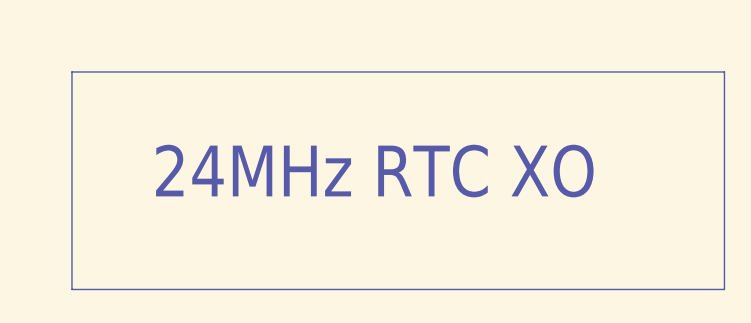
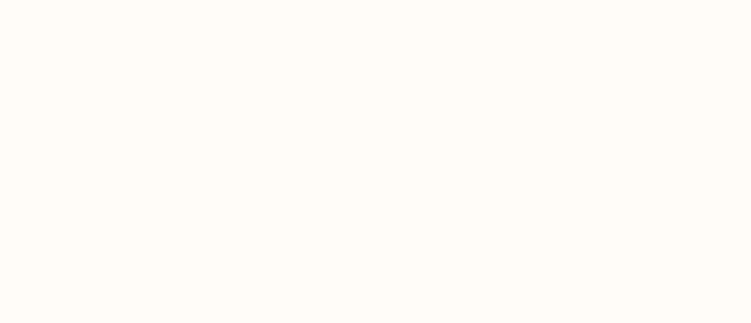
line: (71, 71) (724, 71) (724, 289) (71, 289) (71, 71) -> none
text: 24MHz RTC XO (374, 171) -> none

